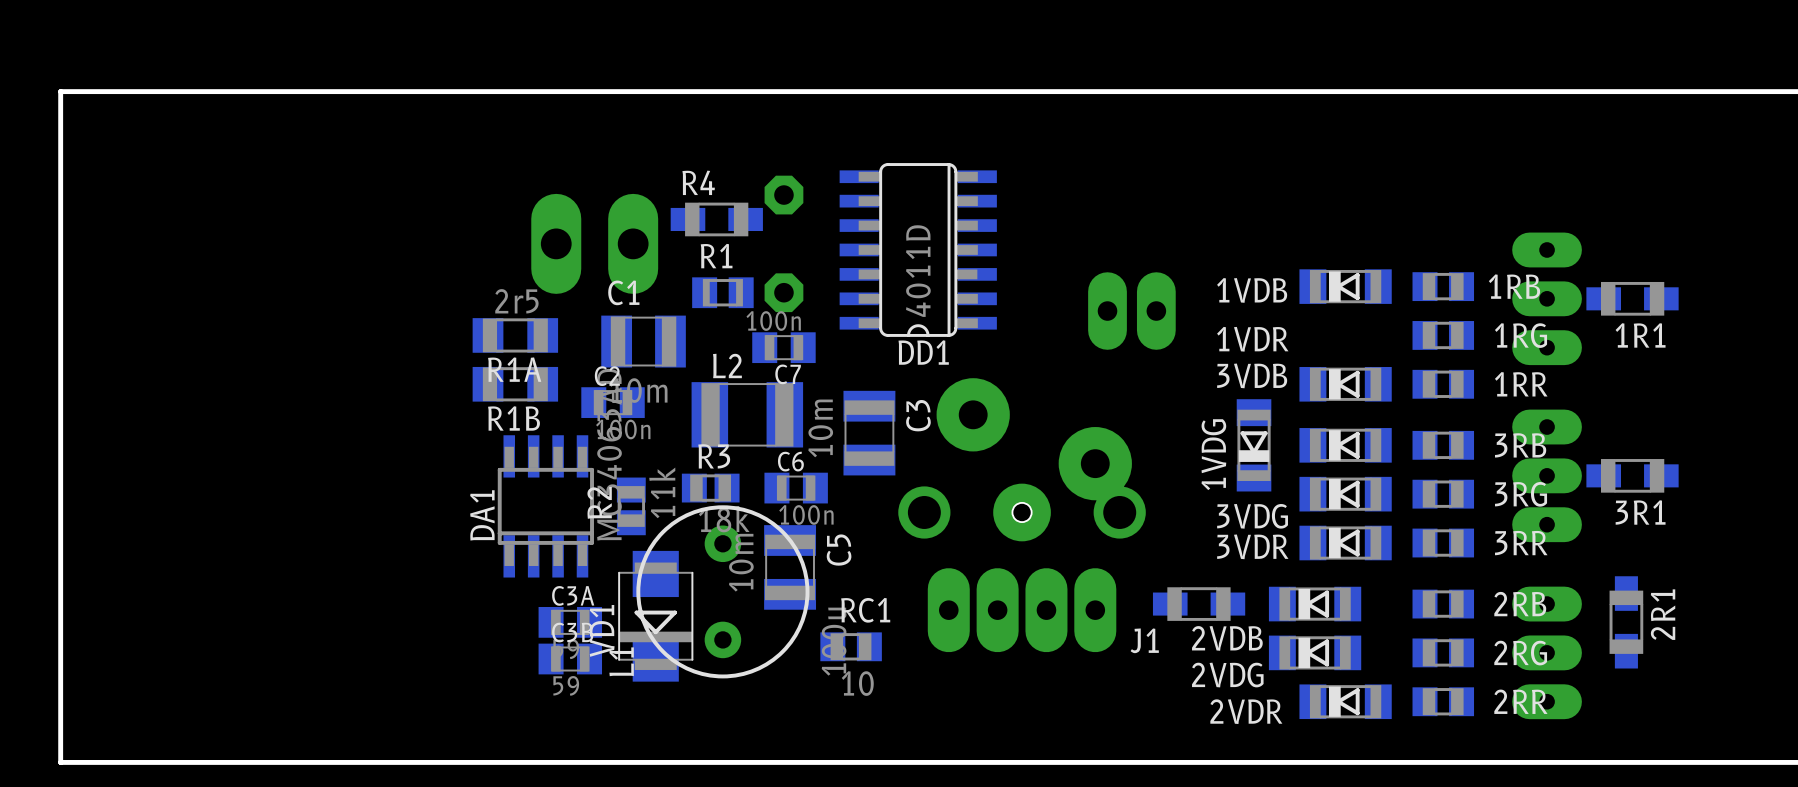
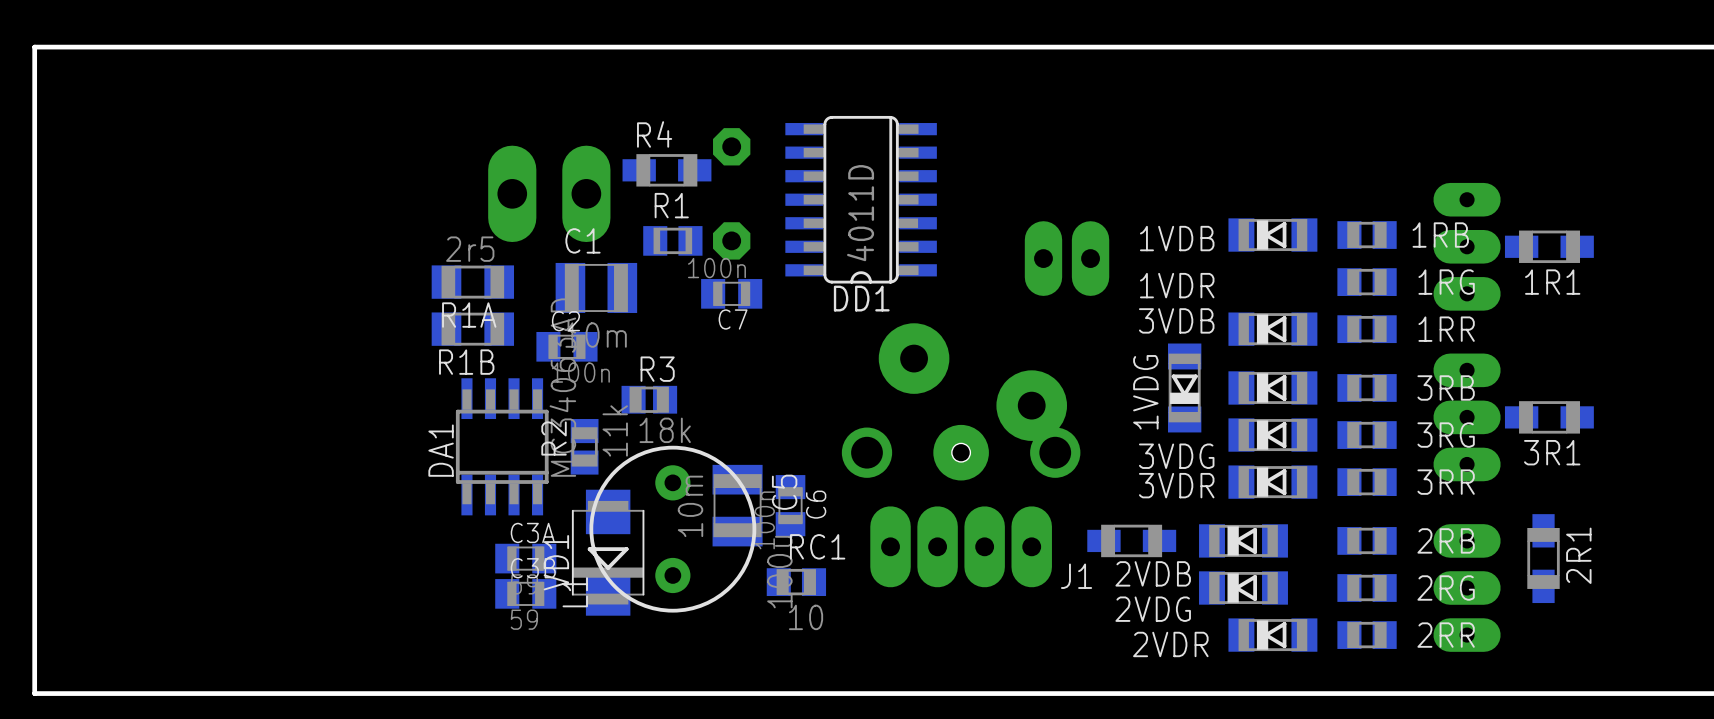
L2: (747, 414) -> none
C3: 10m (869, 433) -> none
R3 position: (710, 488) -> (649, 399)
C6 rotation: 0° (796, 488) -> 90° clockwise (790, 505)
C6 position: (796, 488) -> (790, 505)

